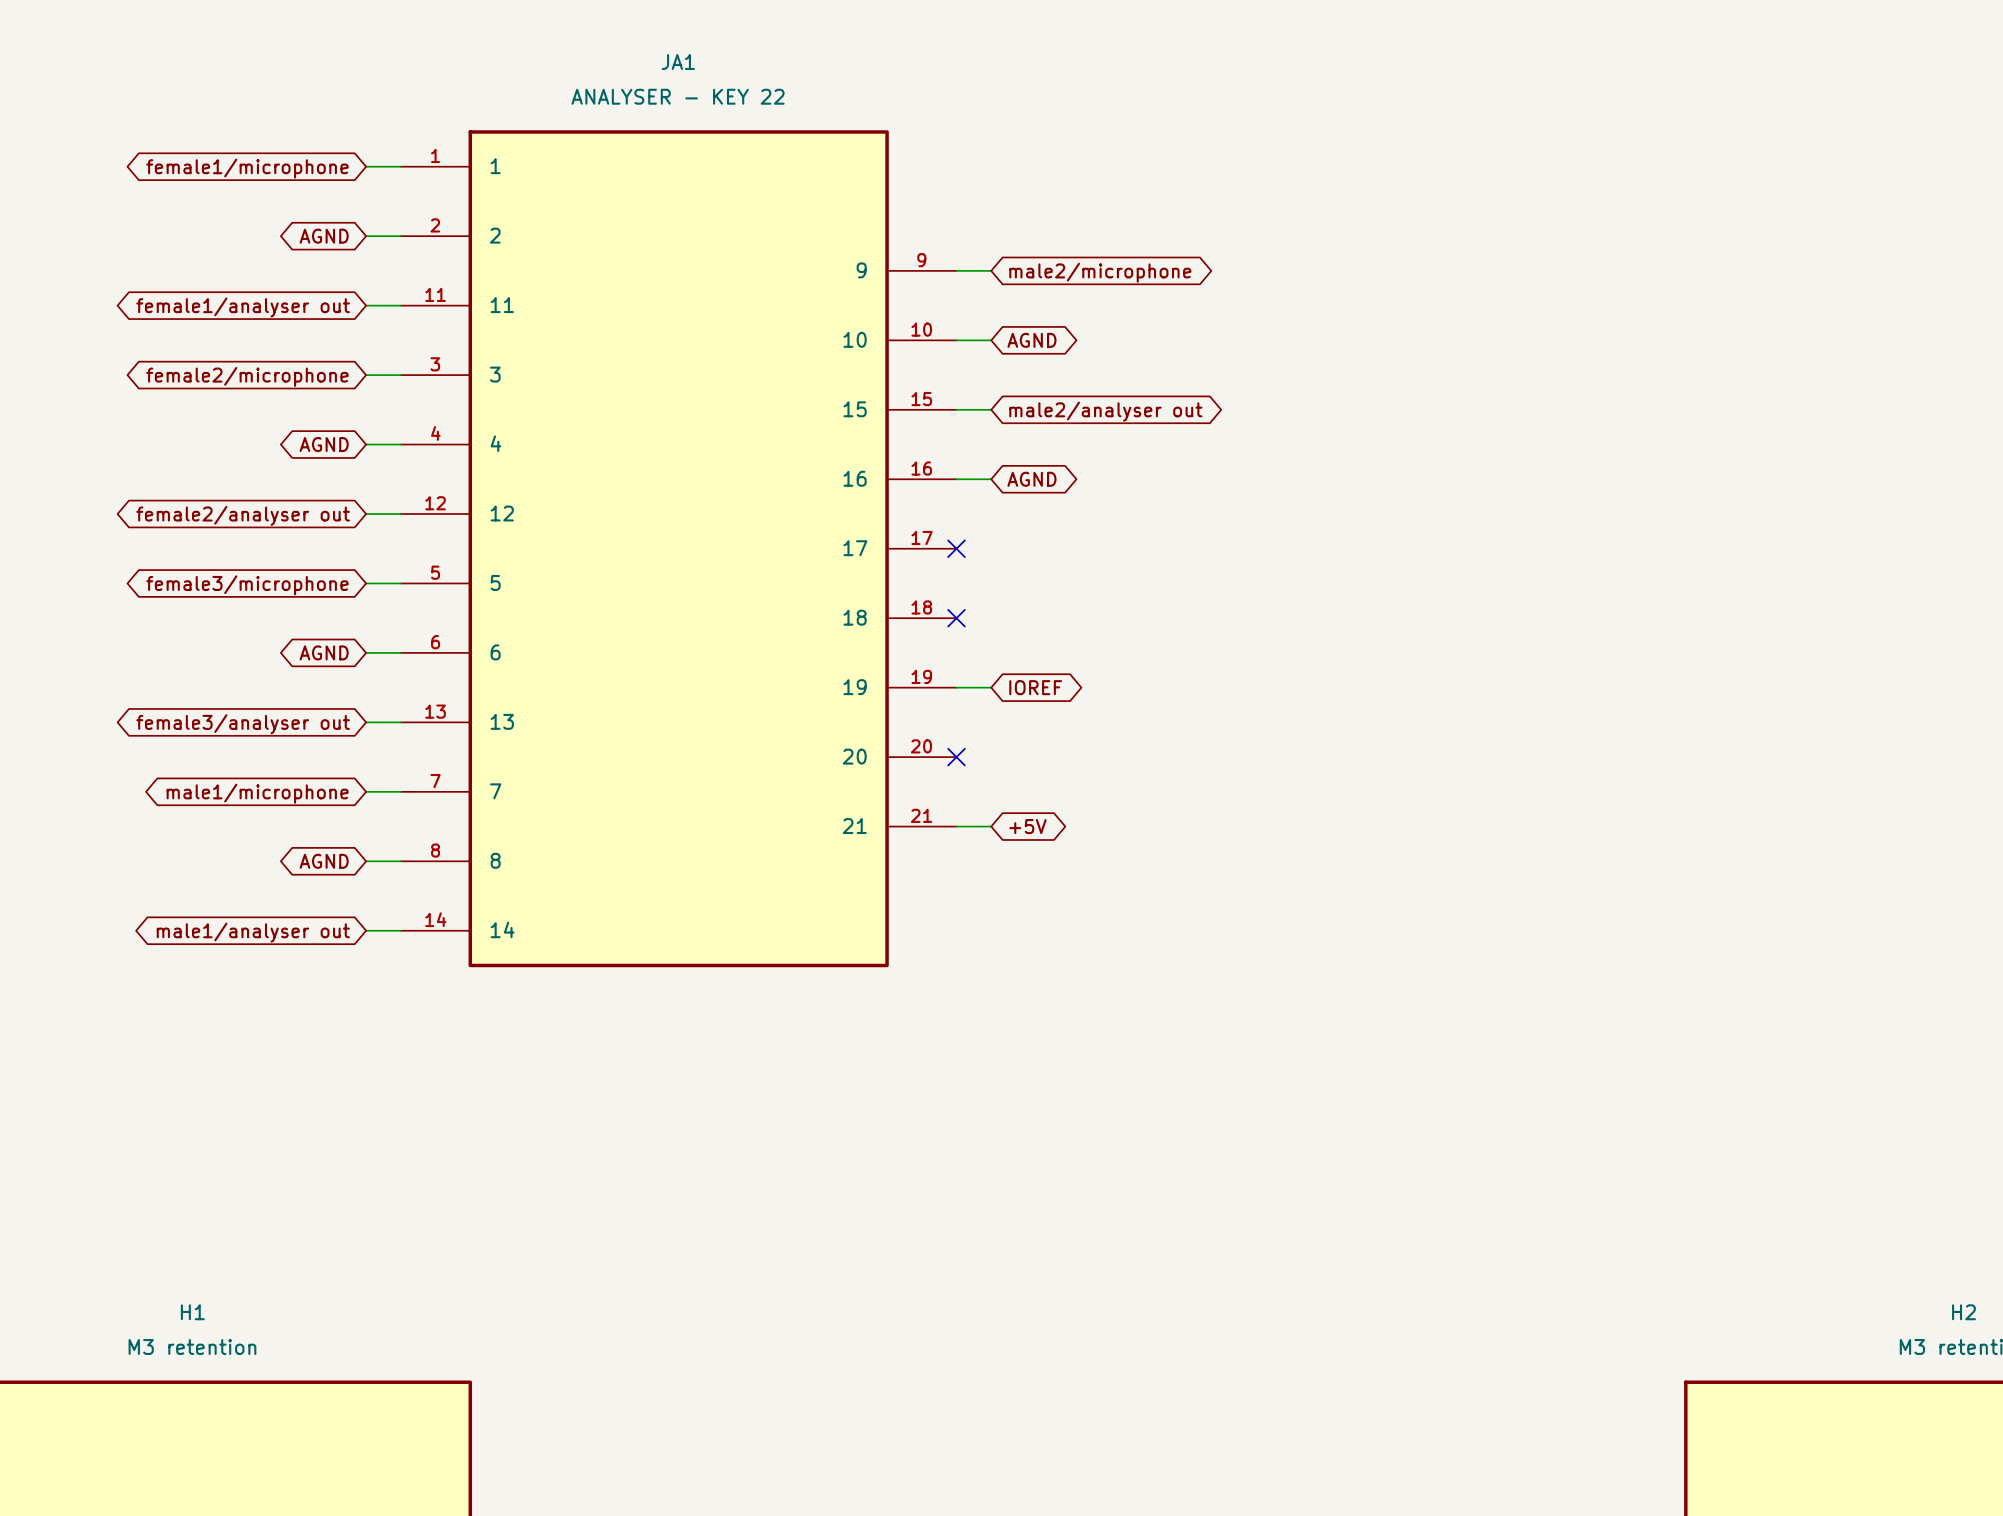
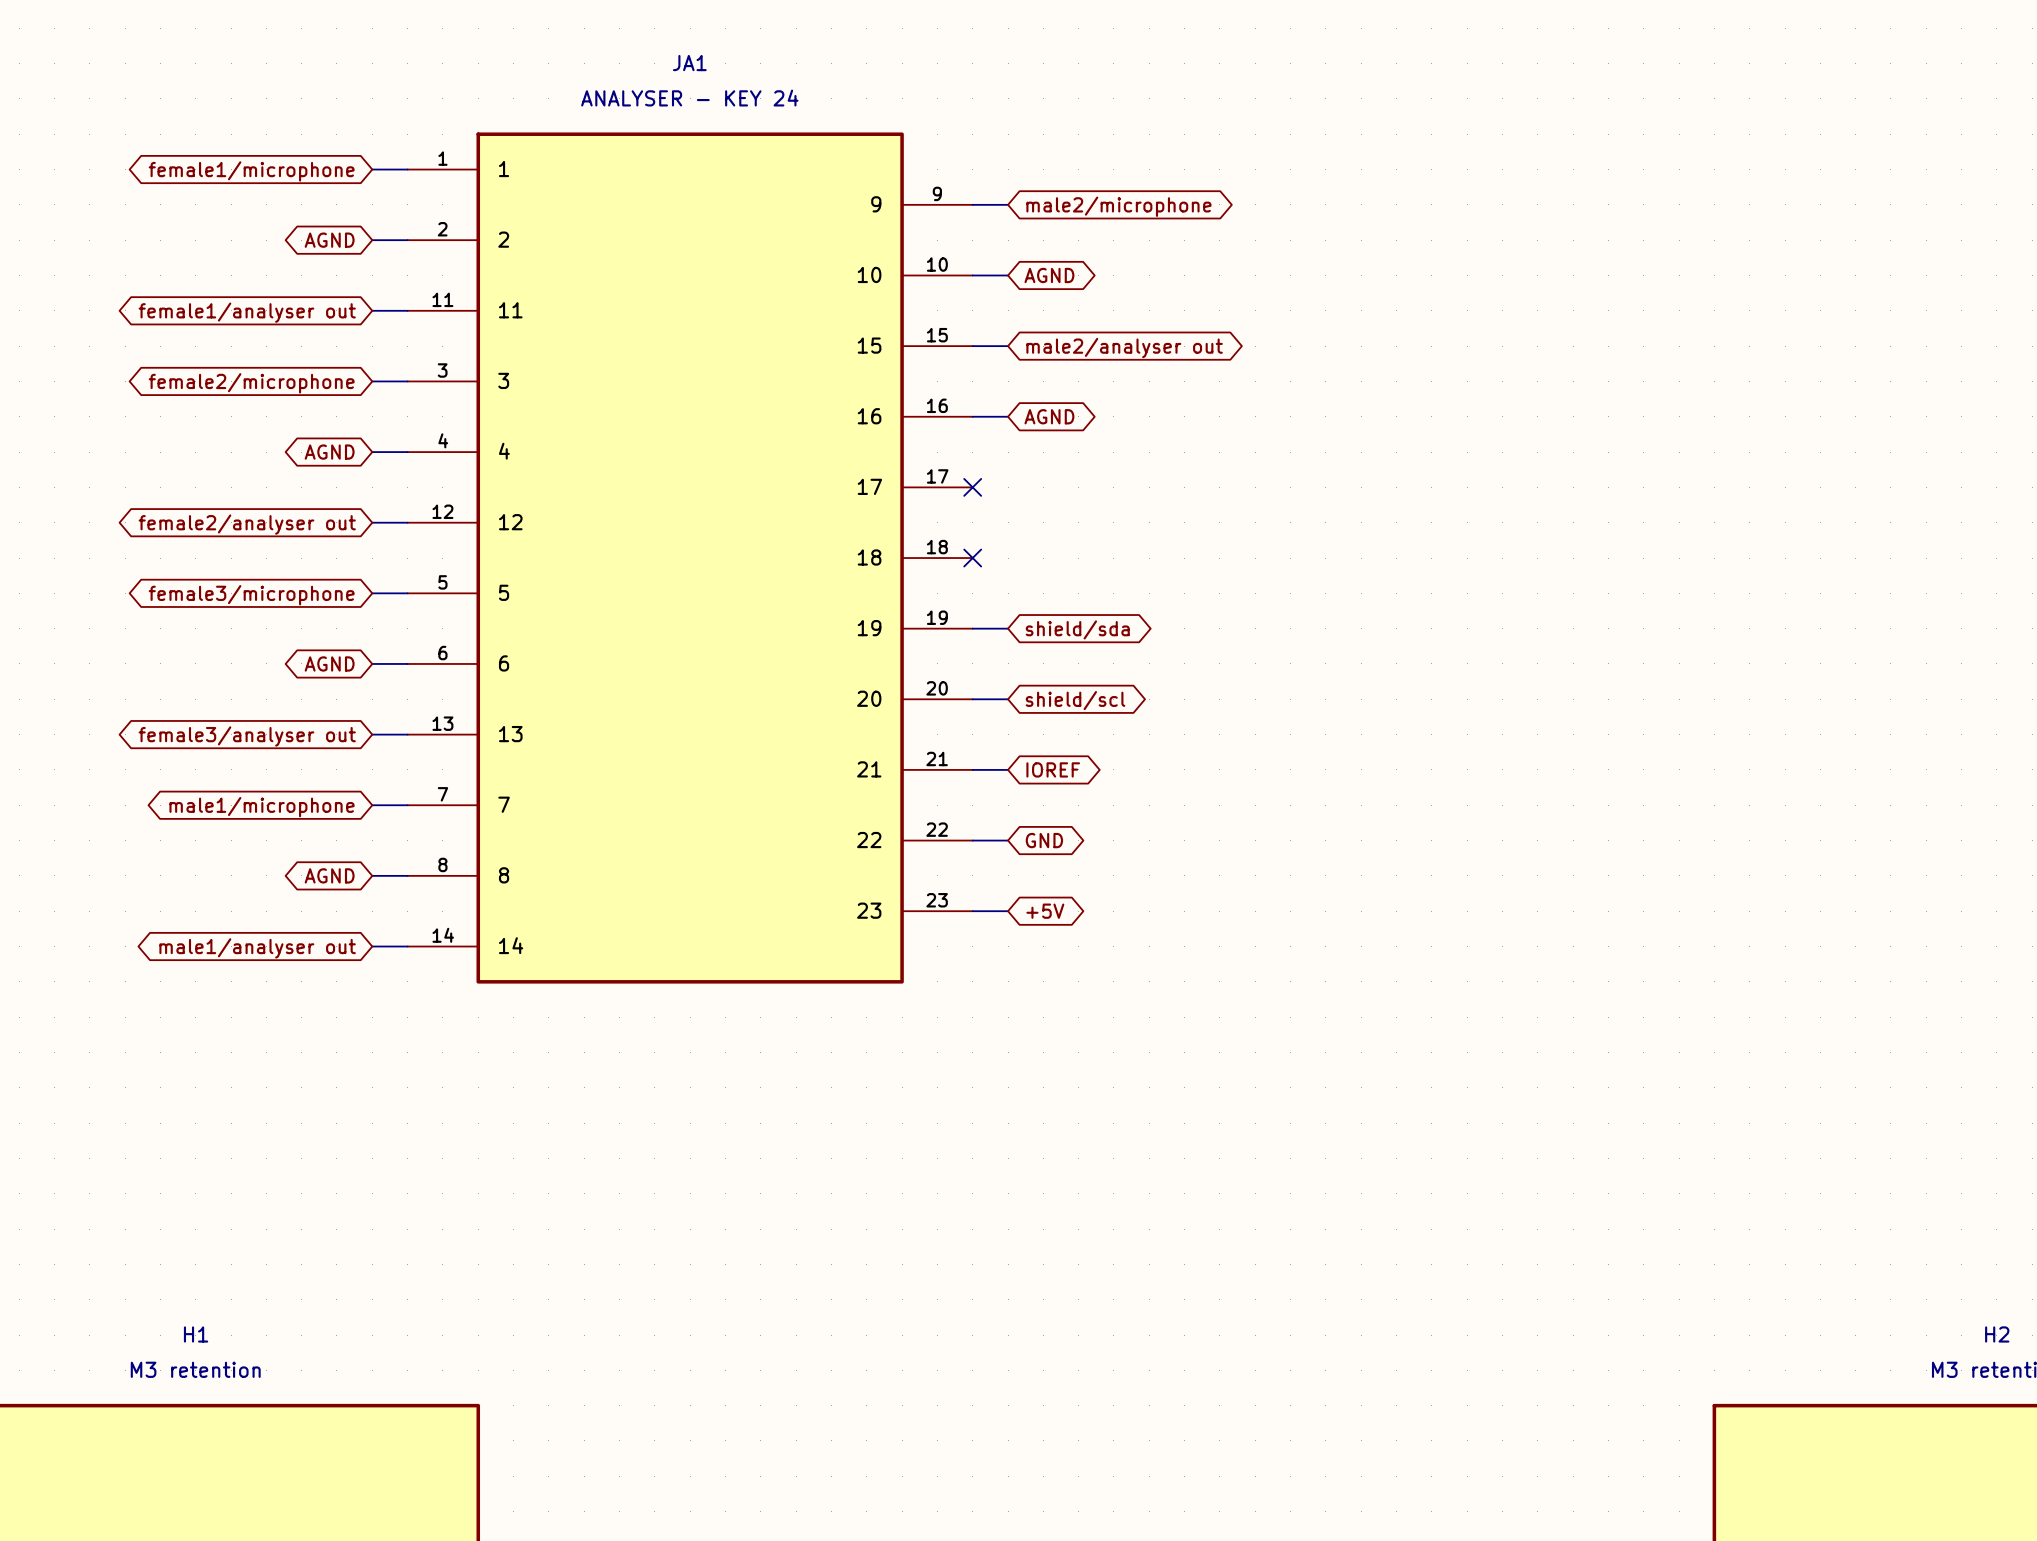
JA1 value: ANALYSER - KEY 22 (678, 96) -> ANALYSER - KEY 24 (689, 98)
JA1 symbol: [400, 130, 957, 968] -> [407, 132, 973, 984]
wire: none -> (972, 204) (1008, 204)
global label: none -> male2/microphone (1118, 206)
global label: male2/microphone (1100, 272) -> AGND (1049, 275)
global label: AGND (1031, 340) -> male2/analyser out (1124, 348)
global label: male2/analyser out (1105, 411) -> AGND (1049, 416)
wire: (956, 479) (991, 479) -> (972, 628) (1008, 628)
no-connect mark: none -> (972, 487)
global label: AGND (1031, 479) -> none
no-connect mark: (956, 618) -> none
global label: none -> shield/sda (1077, 629)
global label: IOREF (1035, 687) -> shield/scl (1075, 700)
wire: none -> (972, 769) (1008, 769)
no-connect mark: (956, 757) -> none
global label: none -> IOREF (1053, 769)
global label: +5V (1027, 826) -> GND (1044, 840)
wire: none -> (972, 911) (1008, 911)
global label: none -> +5V (1045, 911)

